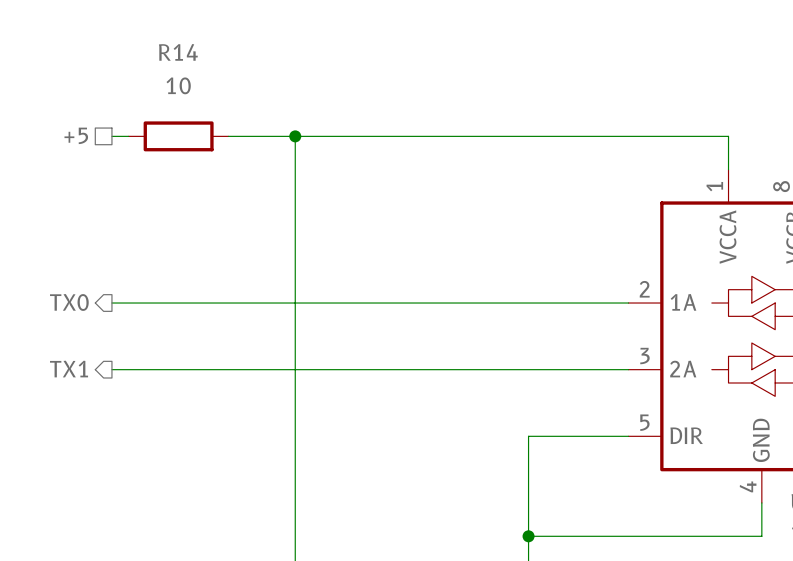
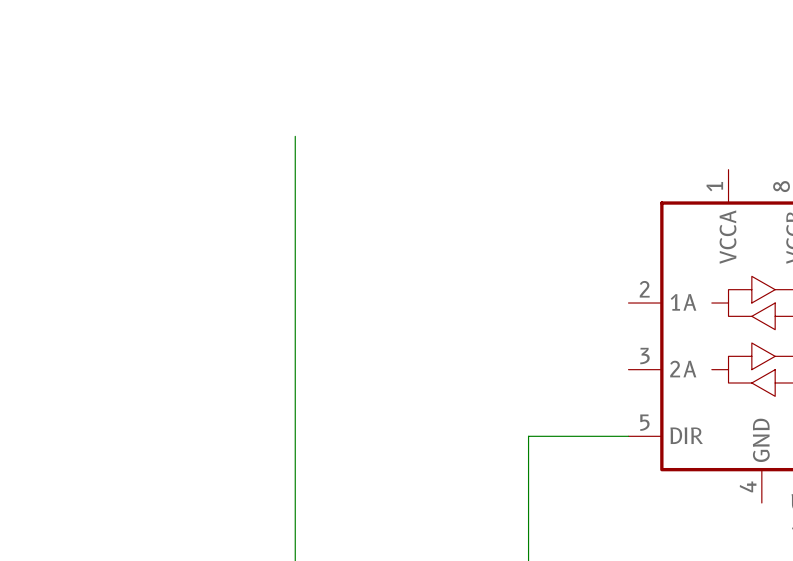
hierarchical label: +5 (76, 135) -> none
wire: (111, 136) (128, 136) -> none
R14: 10 (178, 136) -> none
wire: (228, 136) (728, 136) (728, 169) -> none
junction: (295, 136) -> none
hierarchical label: TX0 (69, 302) -> none
wire: (111, 303) (628, 303) -> none
hierarchical label: TX1 (69, 369) -> none
wire: (111, 369) (628, 369) -> none
wire: (761, 502) (761, 536) (528, 536) -> none
junction: (528, 536) -> none

